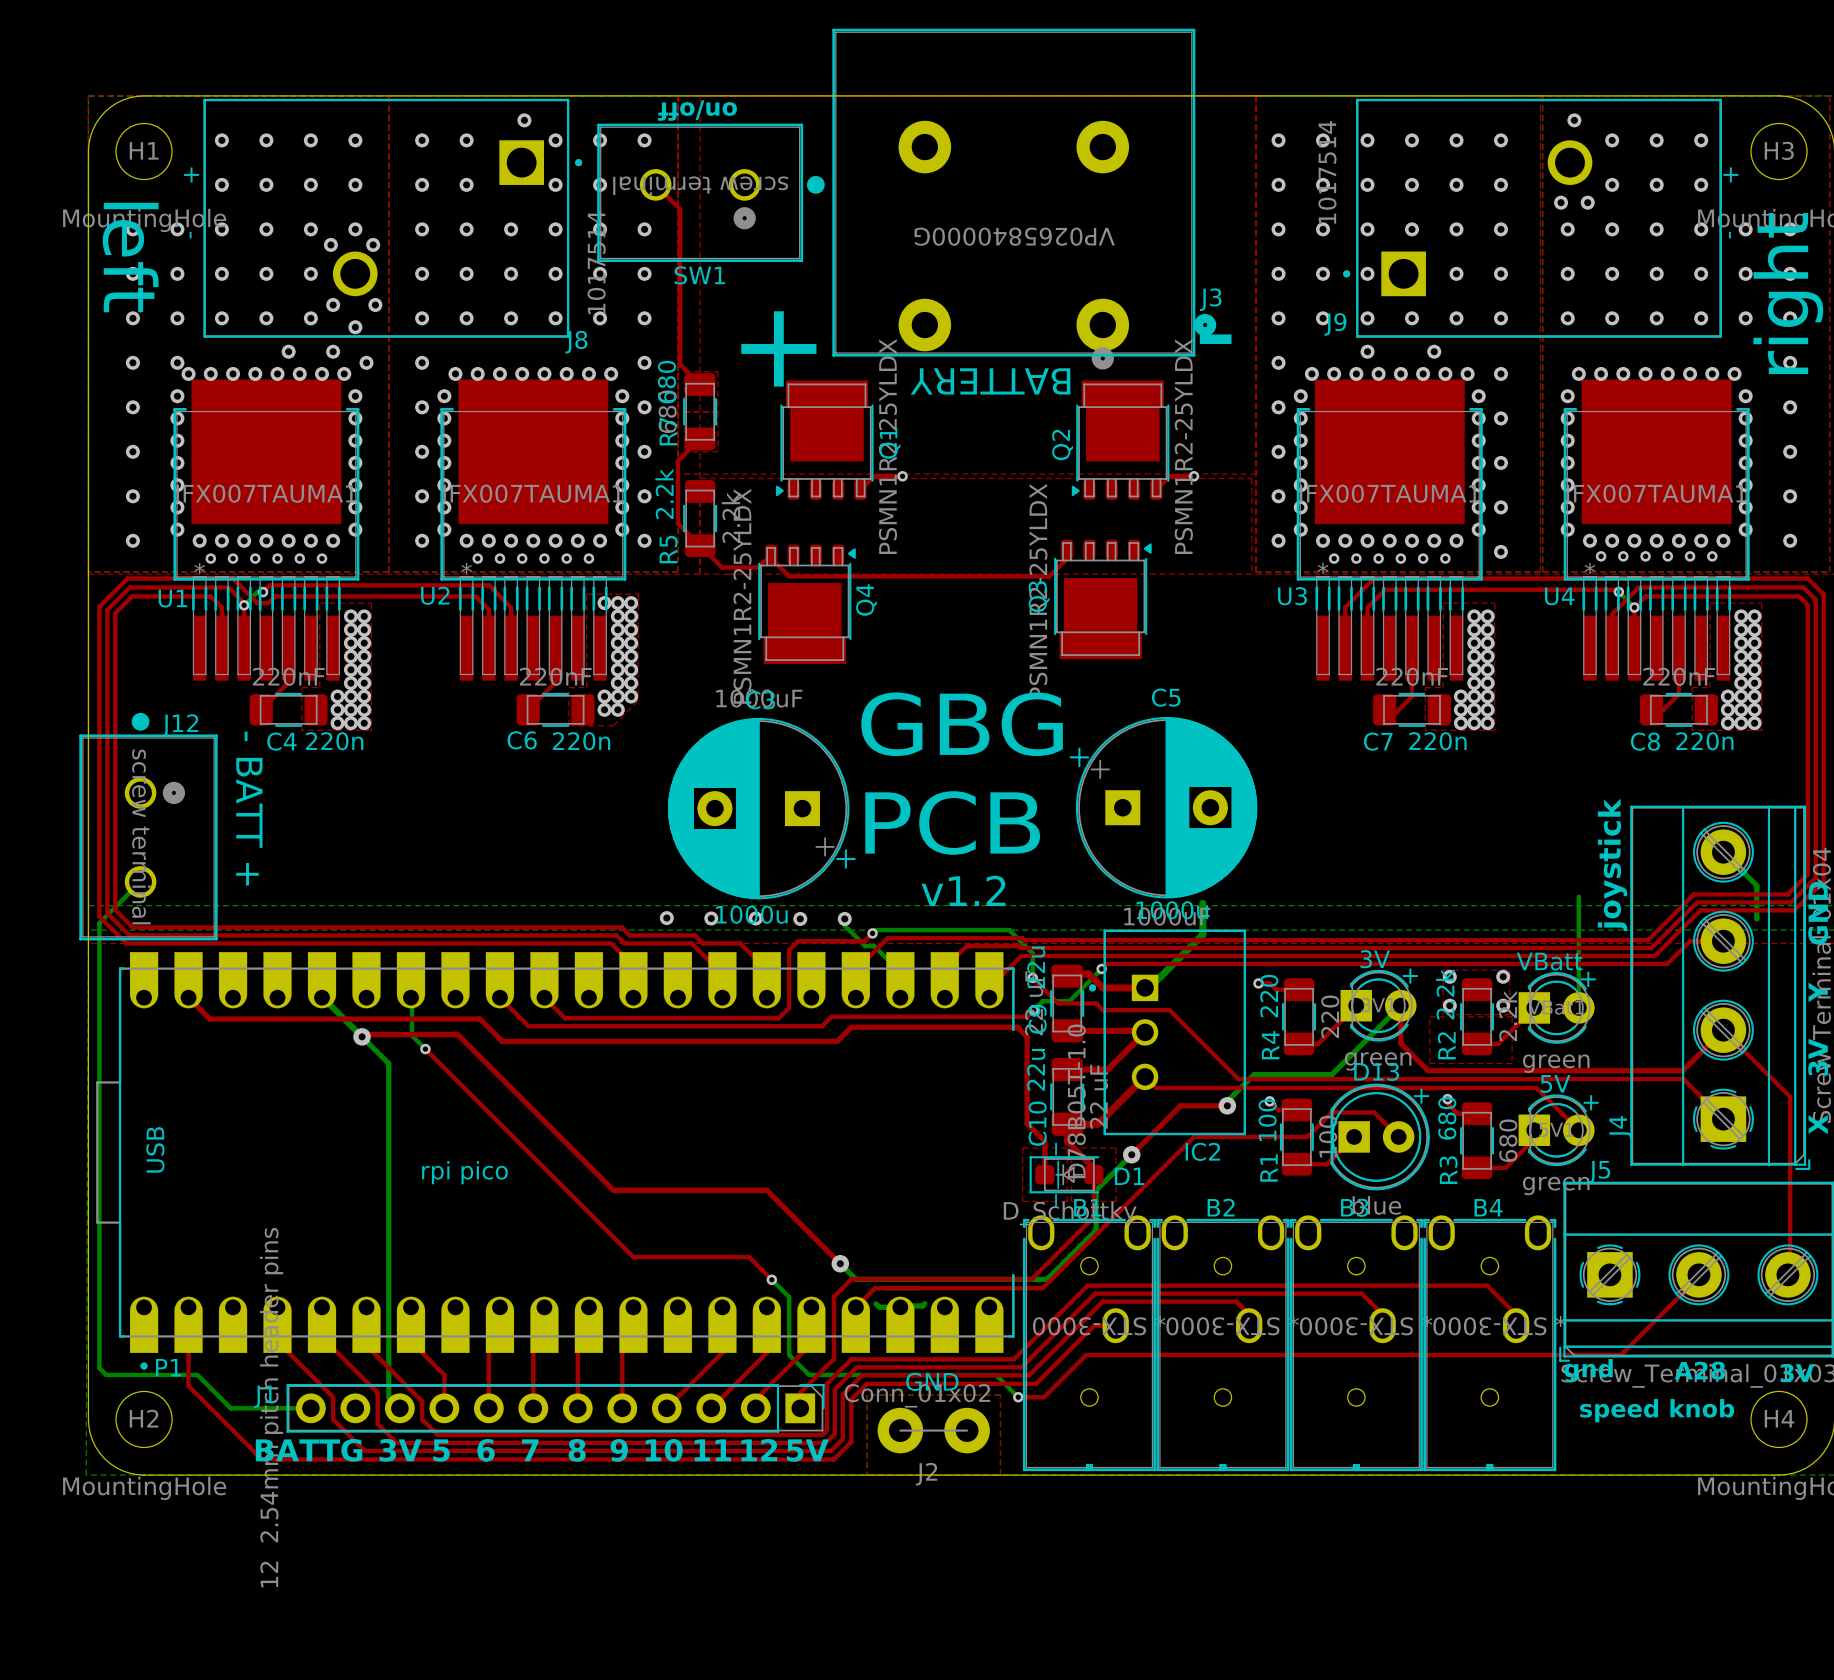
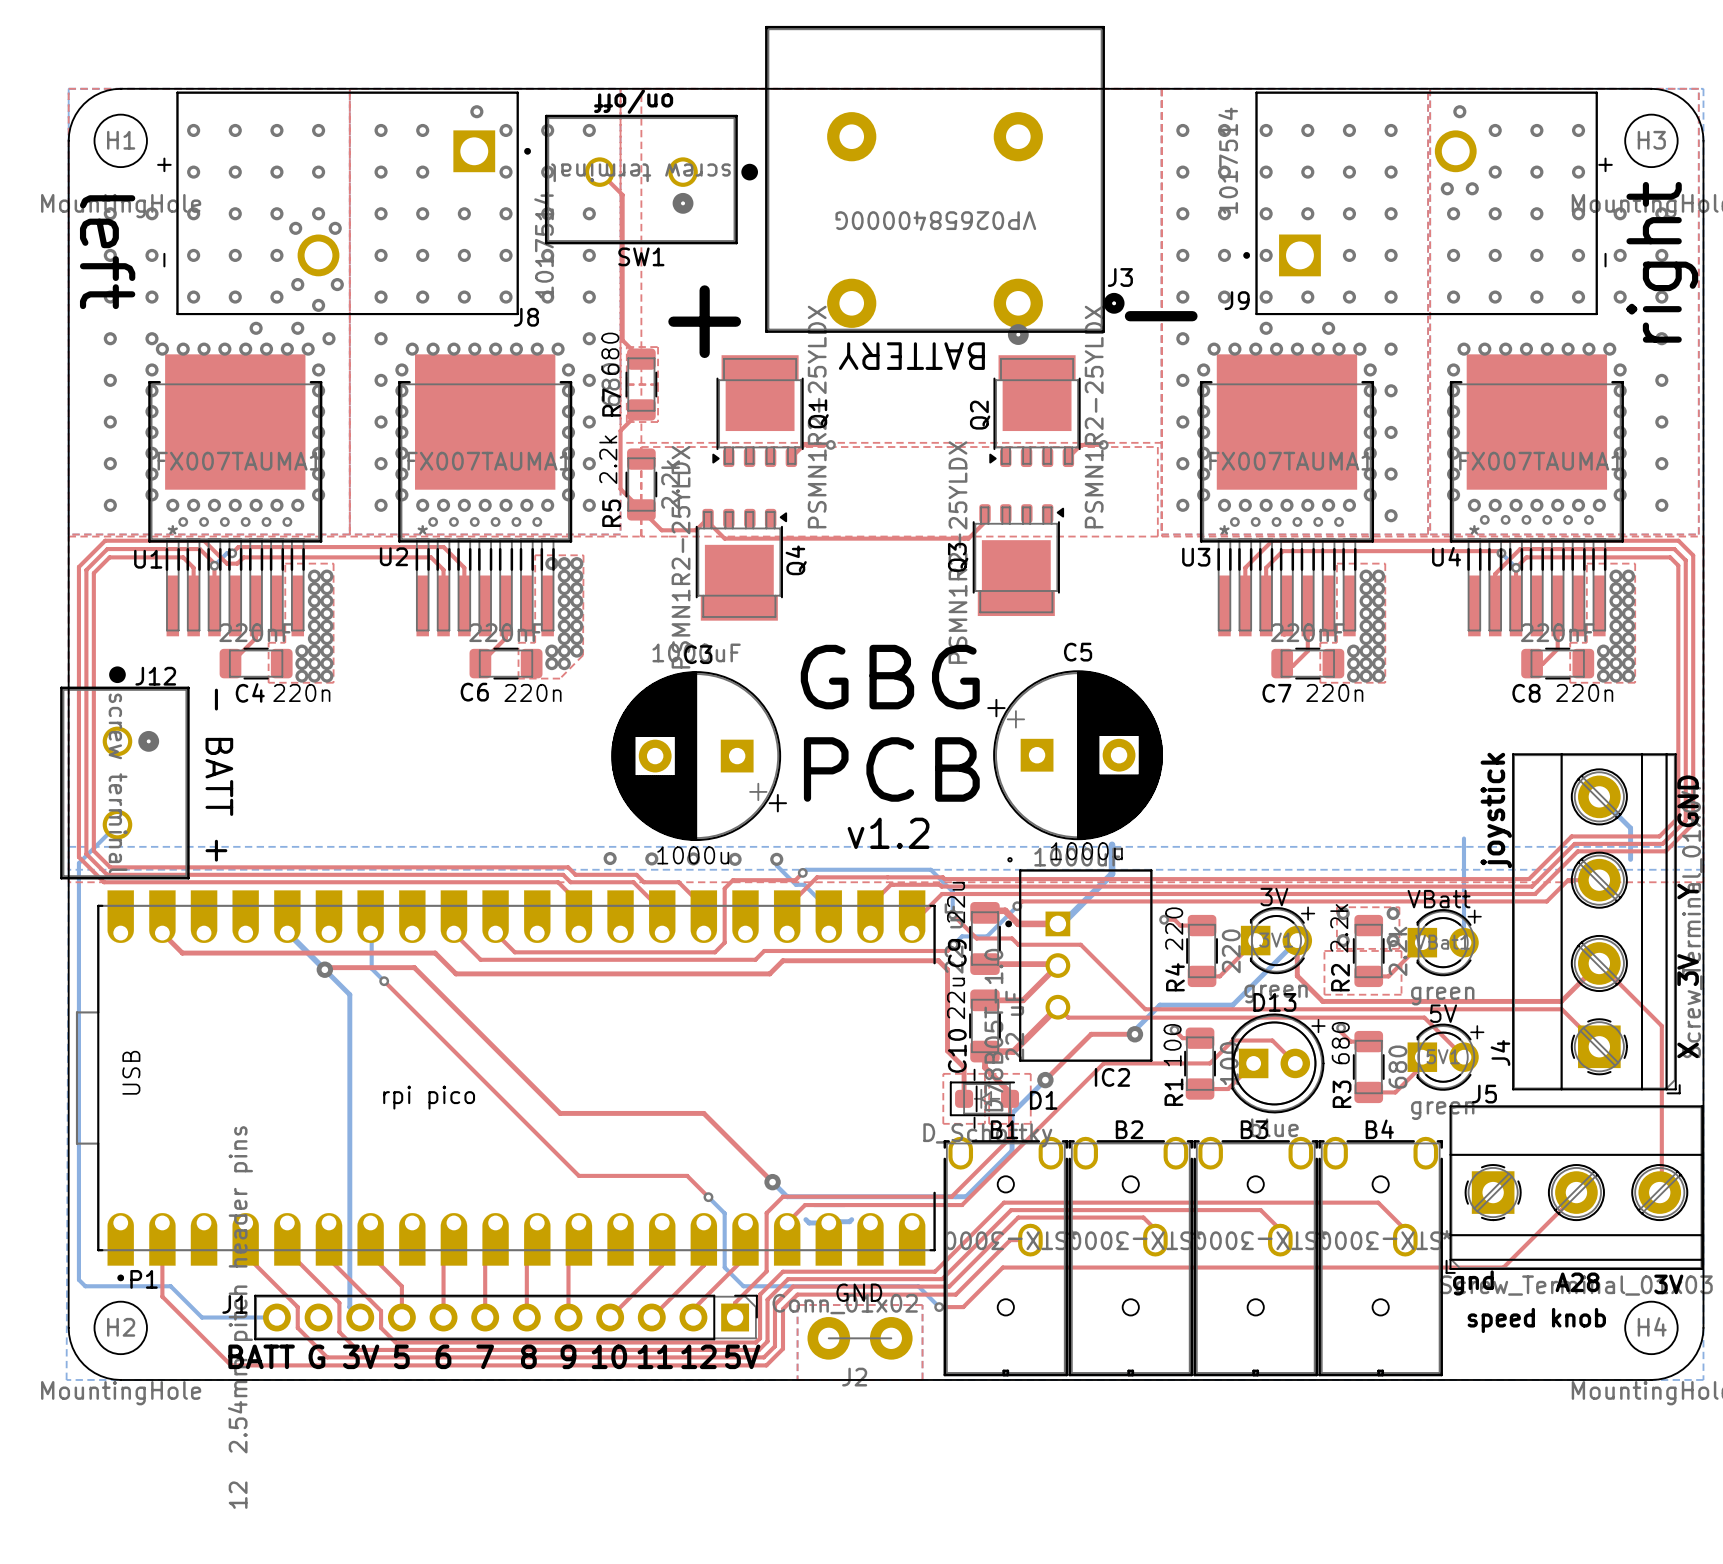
drawing: none -> [1007, 857, 1013, 863]

